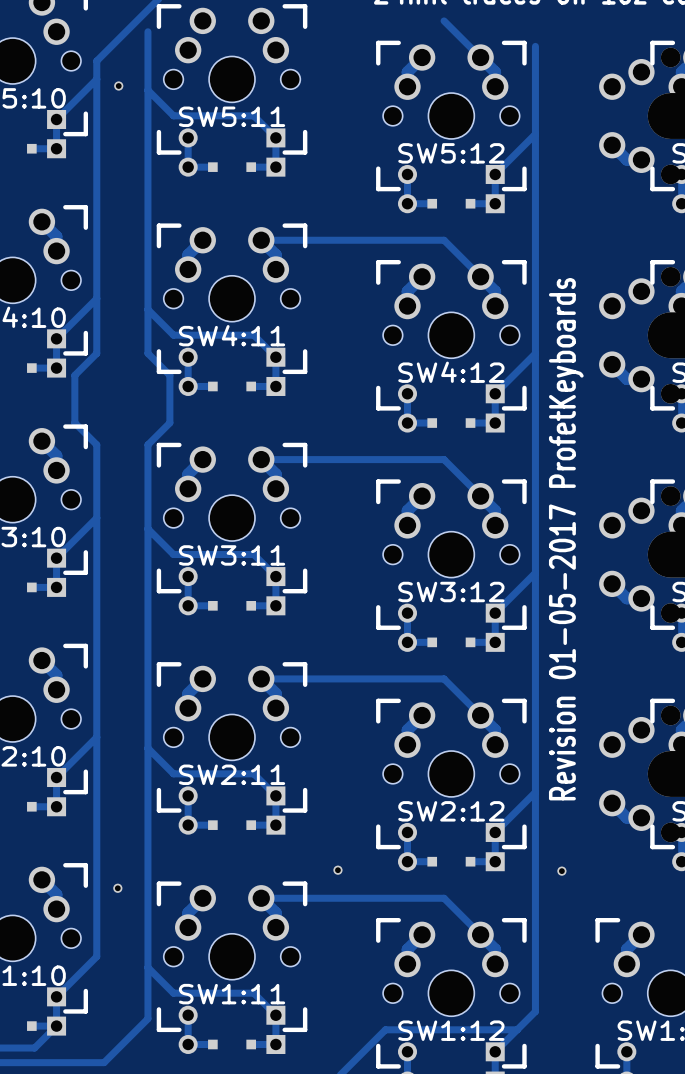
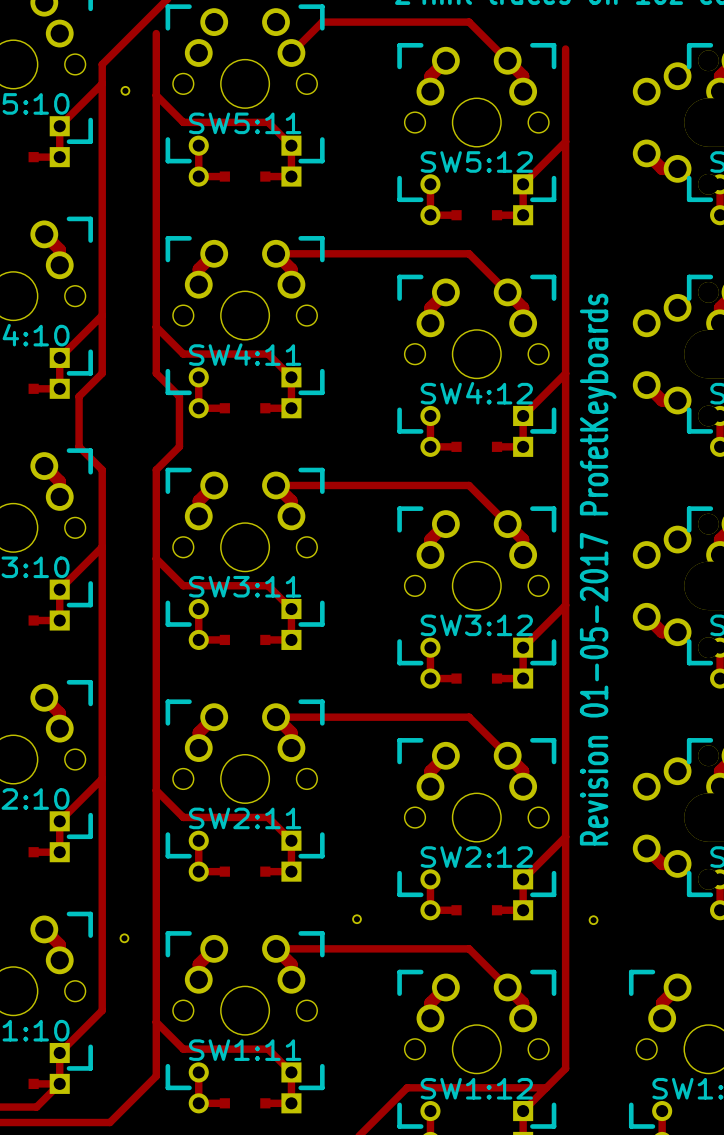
track: none -> (469, 22) (322, 22) (291, 52)

